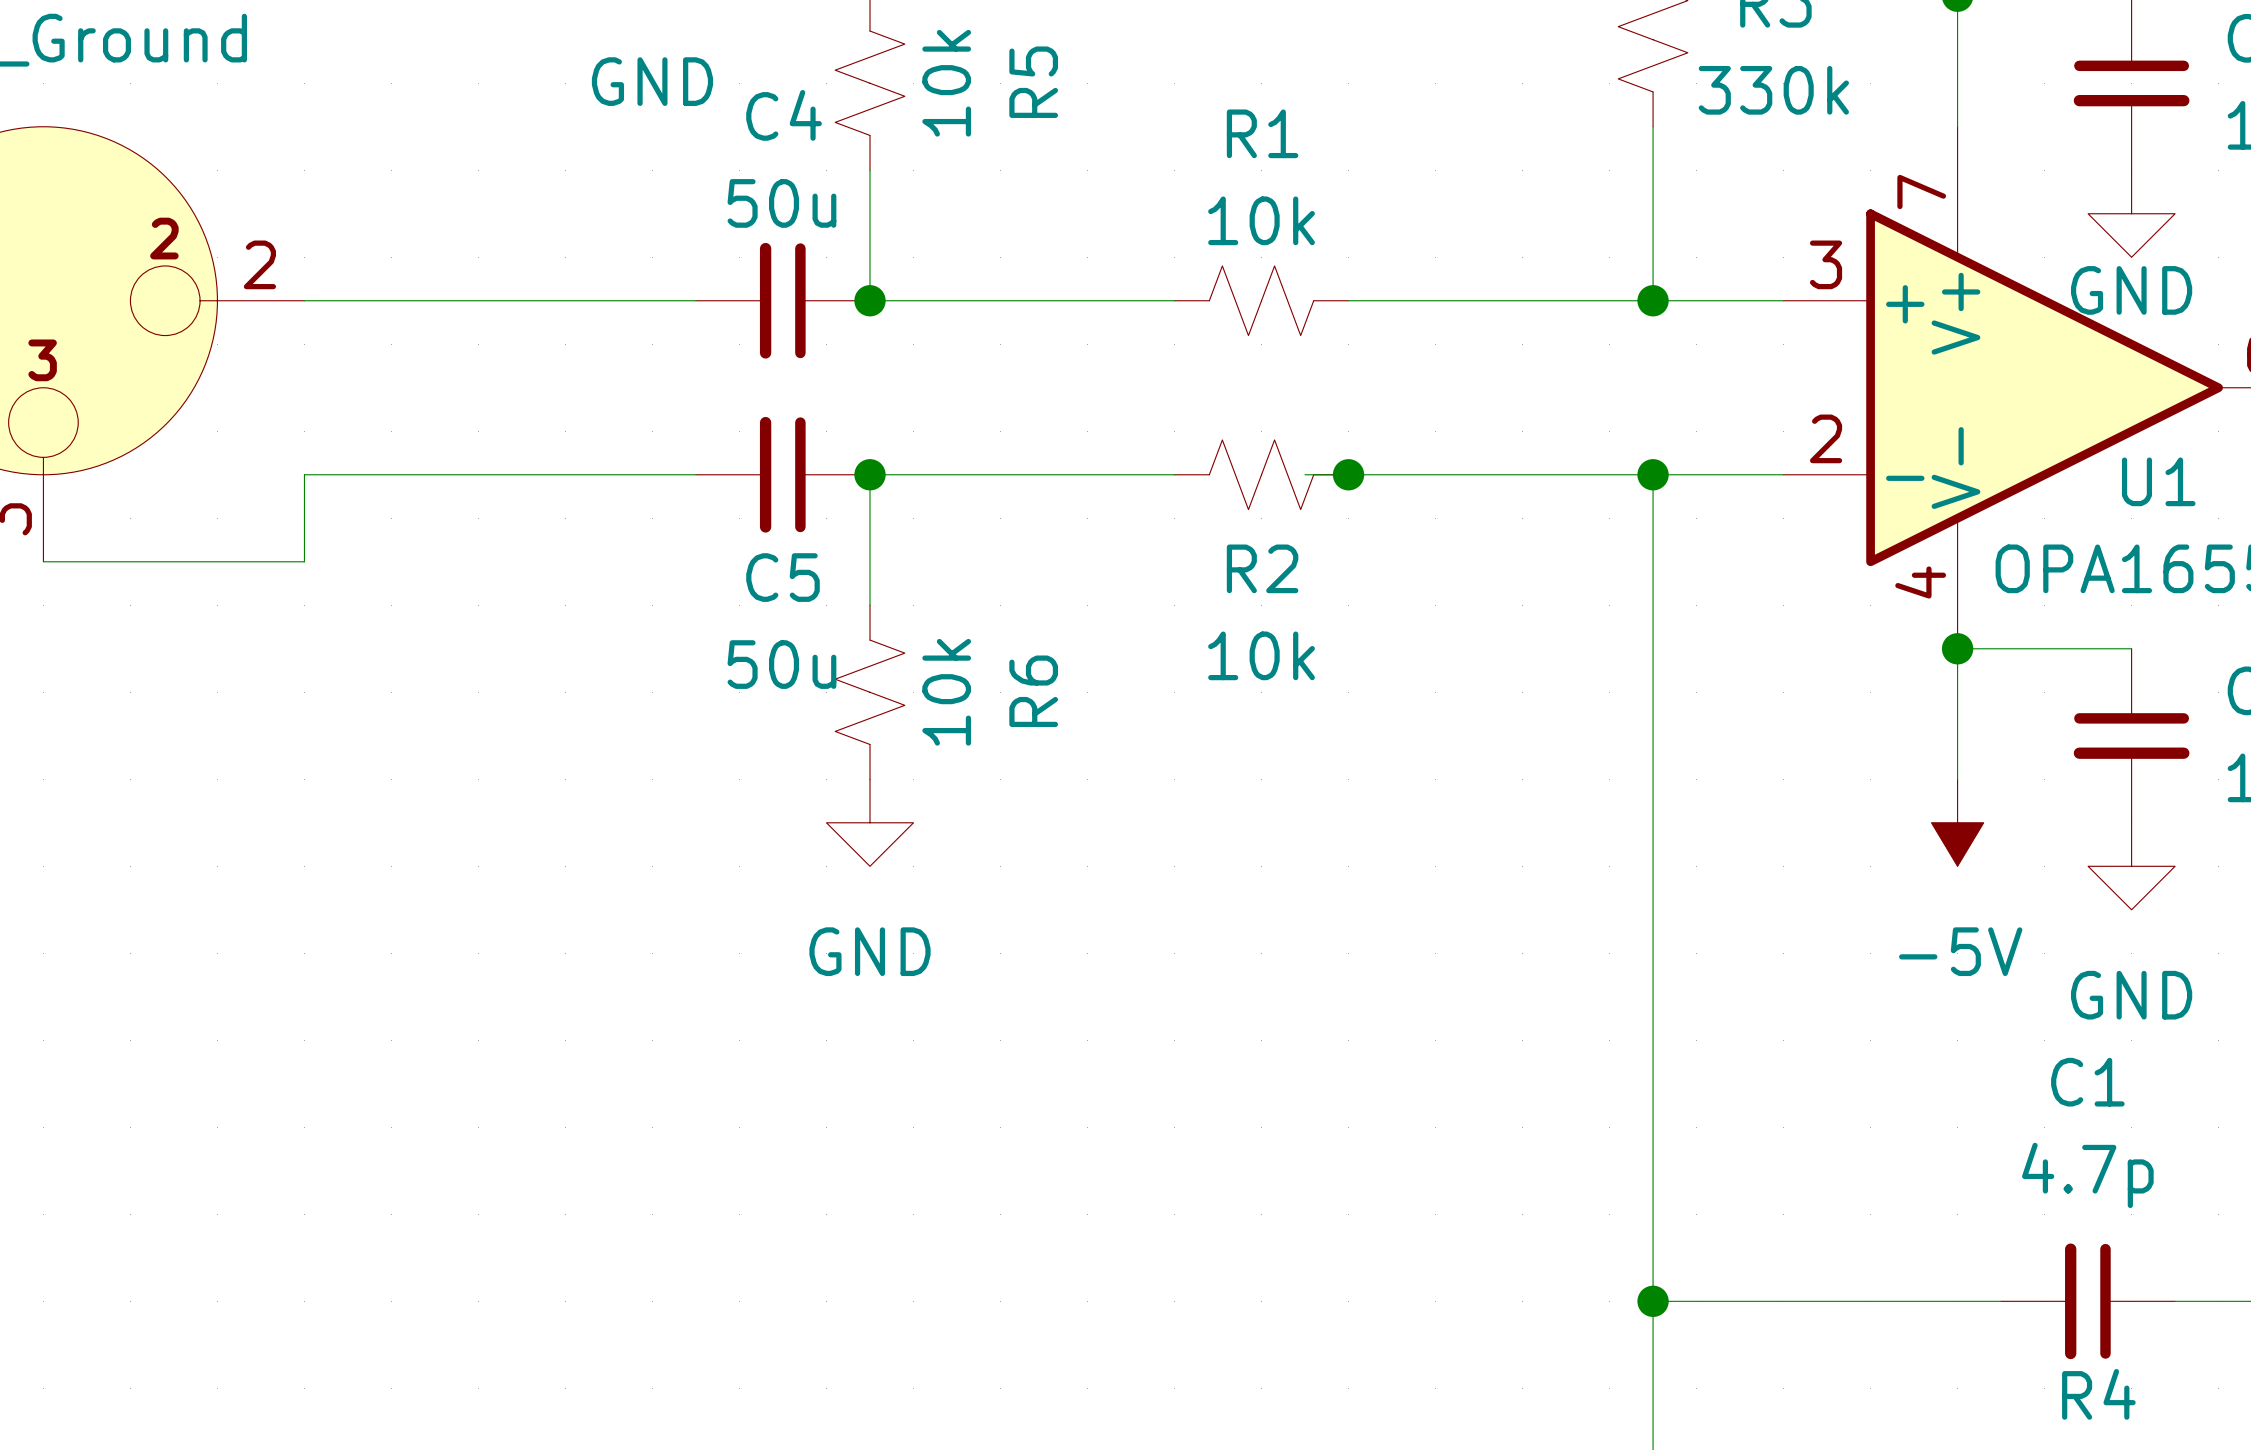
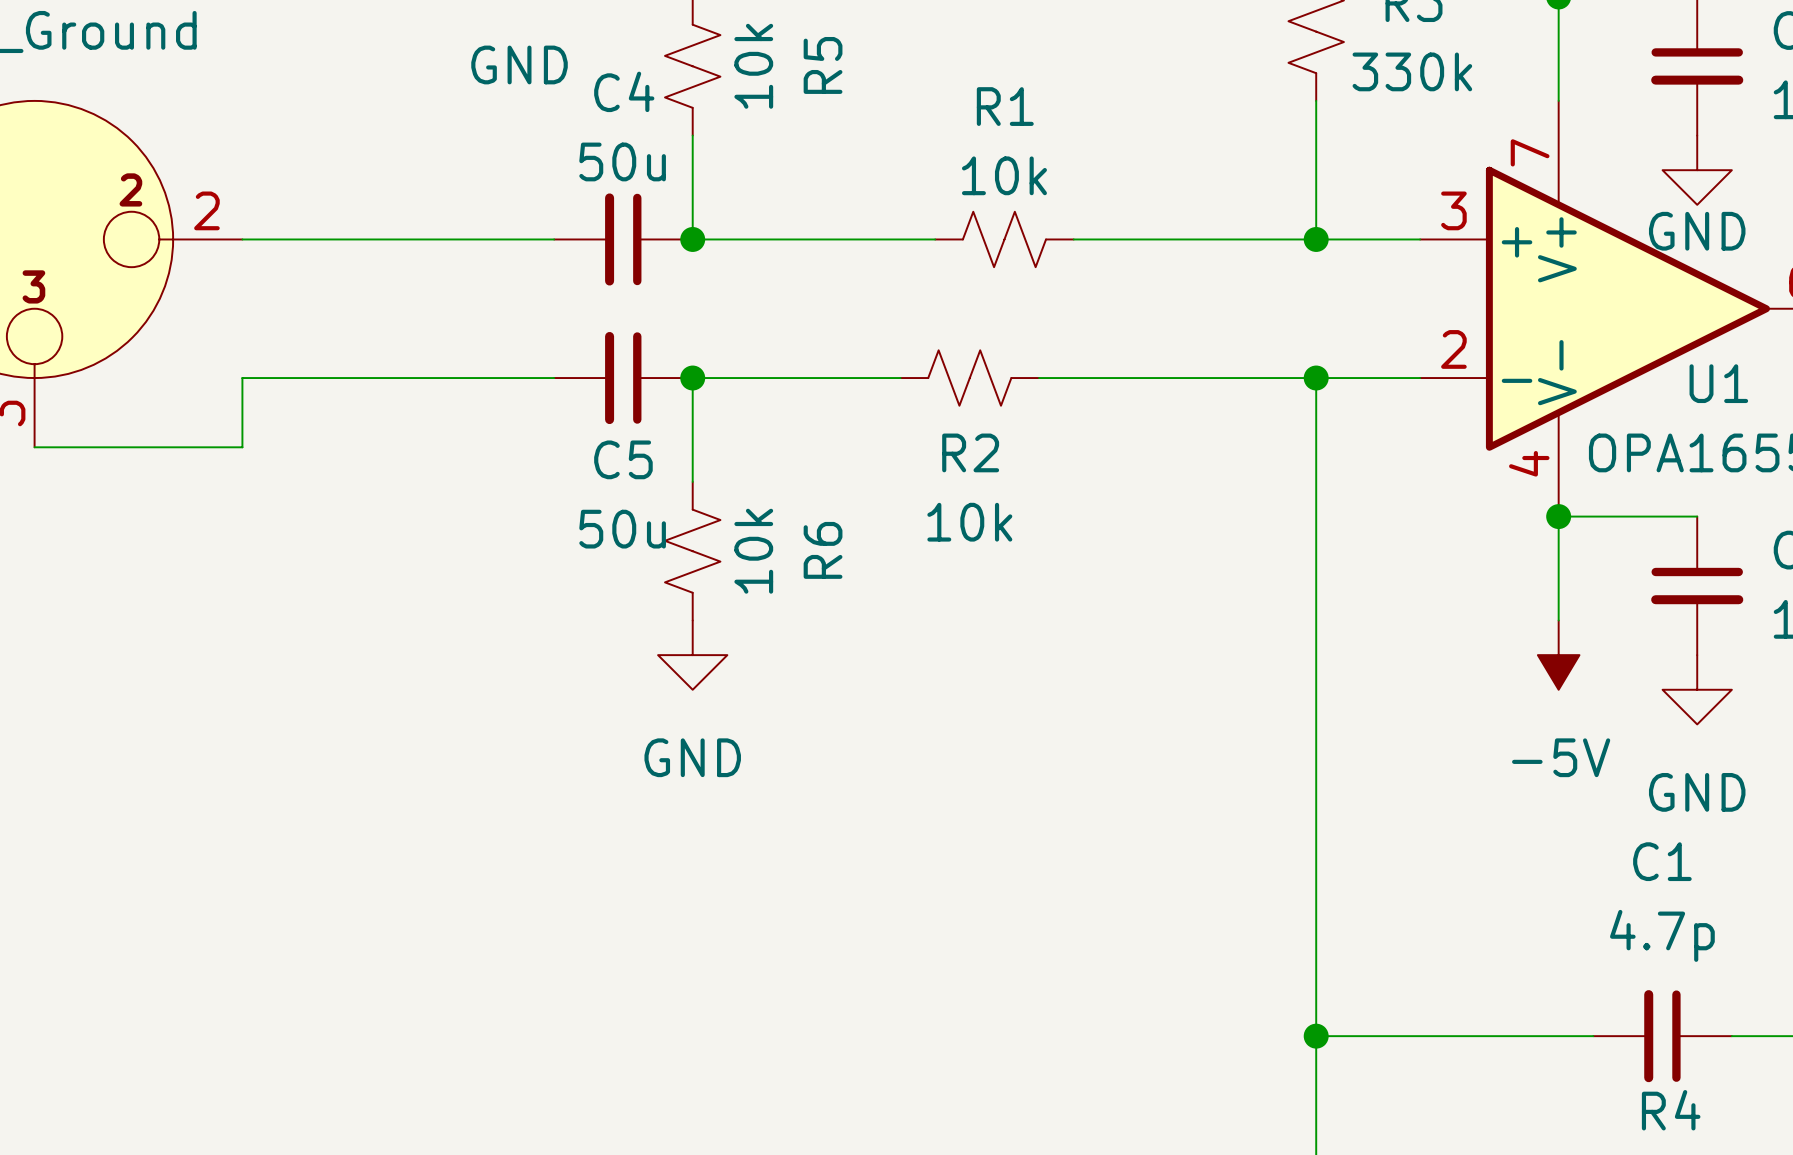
R2 position: (1261, 474) -> (969, 378)
junction: (1348, 474) -> none

